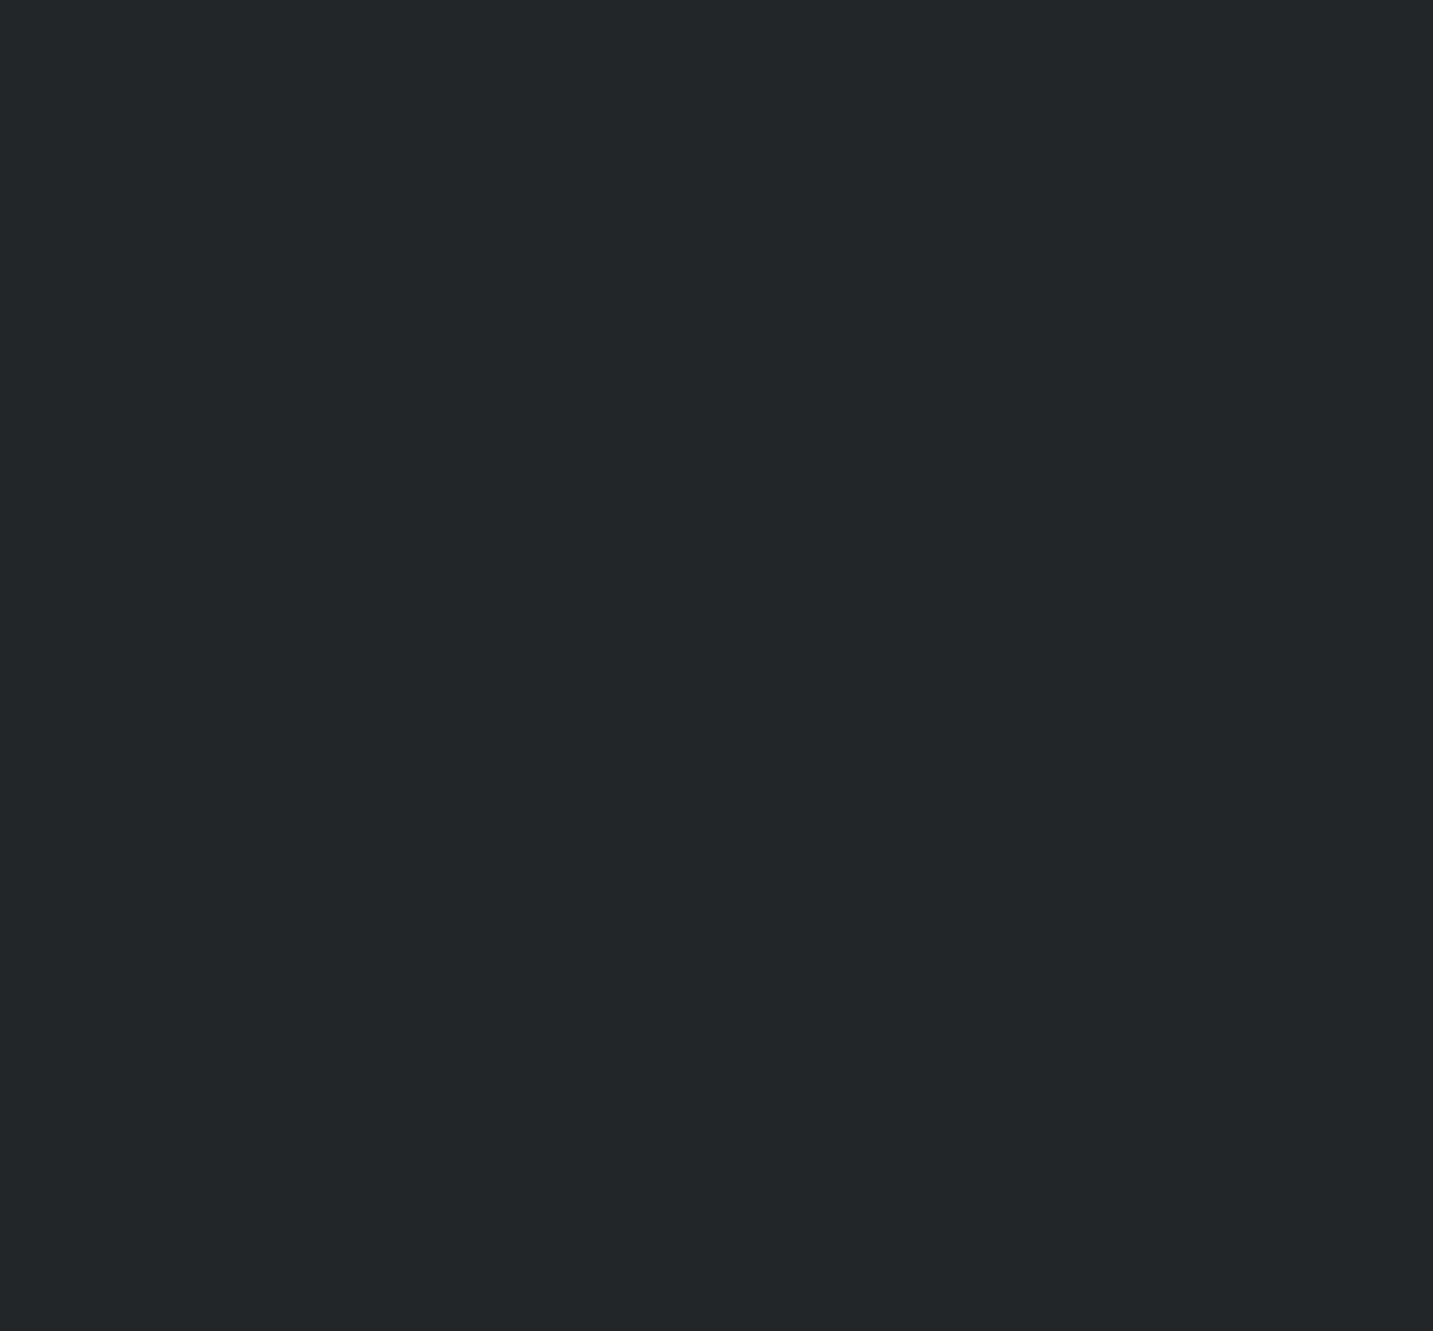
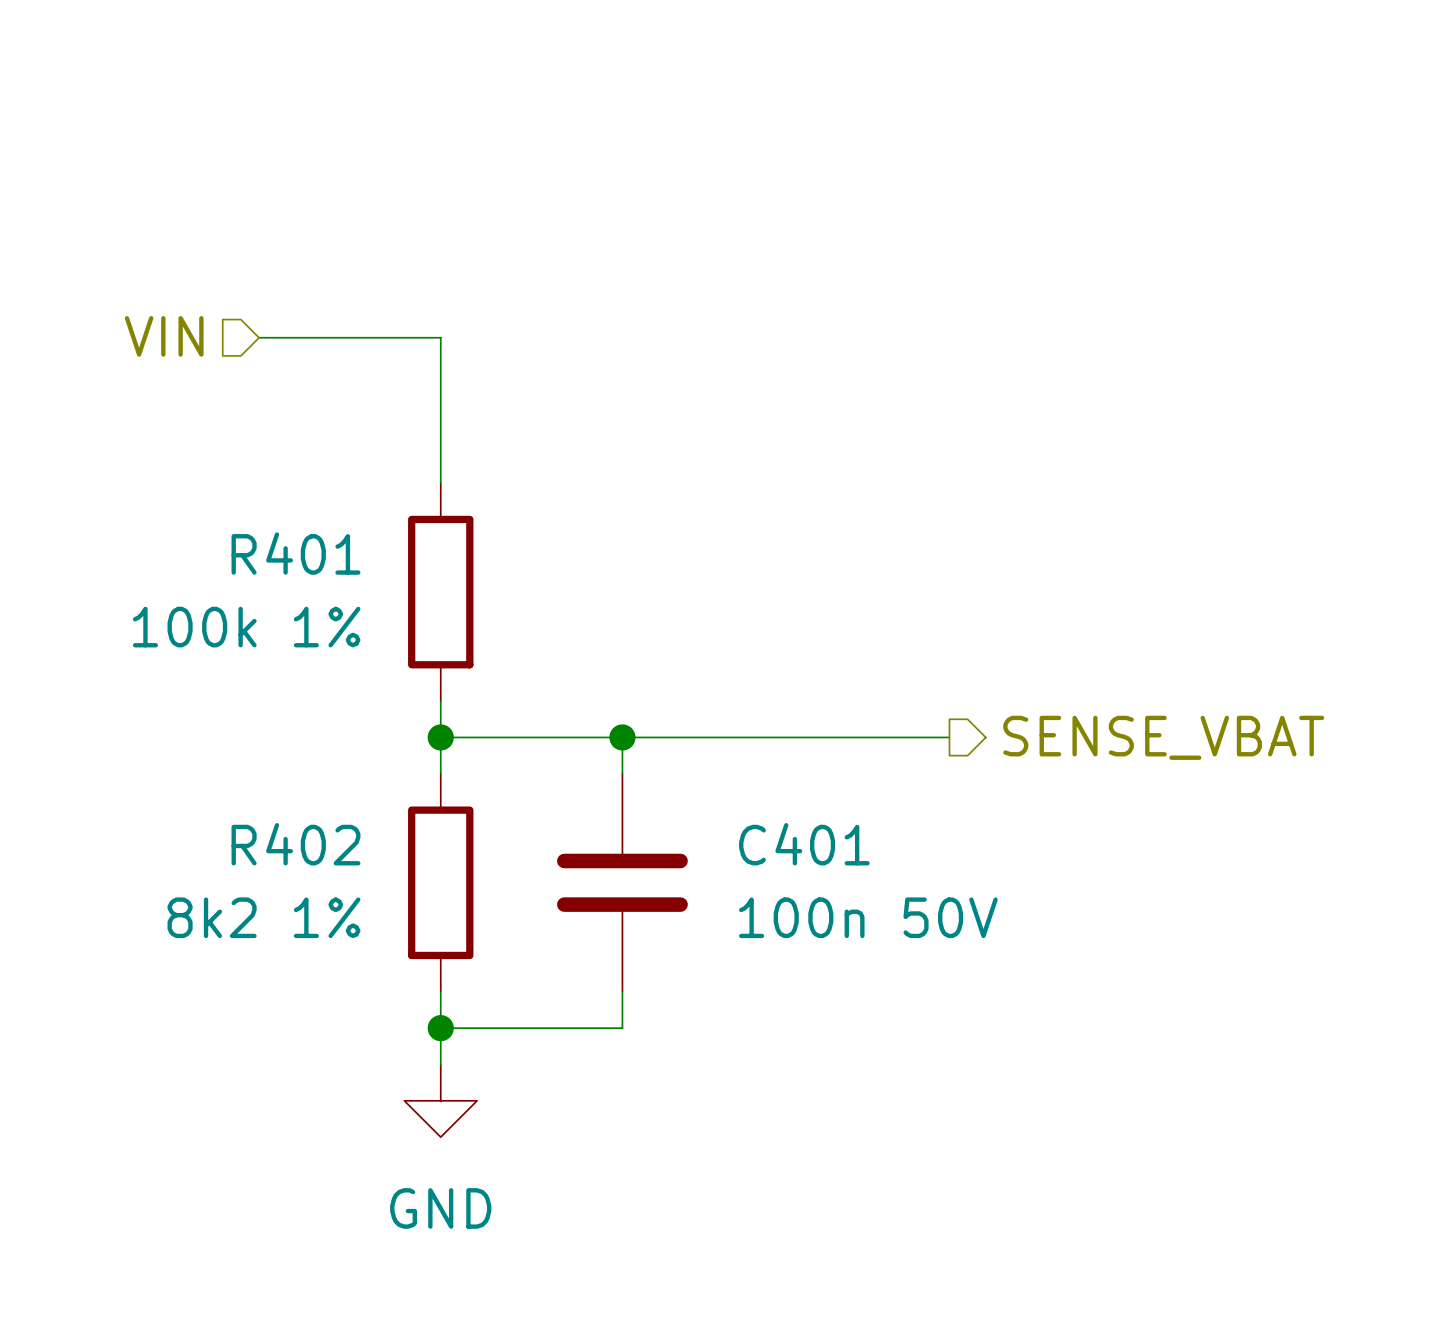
hierarchical label: none -> VIN (164, 336)
wire: none -> (259, 337) (440, 337) (440, 483)
R401: none -> 100k 1% (440, 592)
wire: none -> (440, 701) (440, 773)
wire: none -> (440, 737) (949, 737)
junction: none -> (440, 737)
wire: none -> (622, 737) (622, 773)
junction: none -> (622, 737)
hierarchical label: none -> SENSE_VBAT (1163, 737)
R402: none -> 8k2 1% (440, 882)
C401: none -> 100n 50V (622, 882)
wire: none -> (440, 991) (440, 1064)
wire: none -> (622, 991) (622, 1028) (440, 1028)
junction: none -> (440, 1028)
power symbol: none -> GND (440, 1100)

